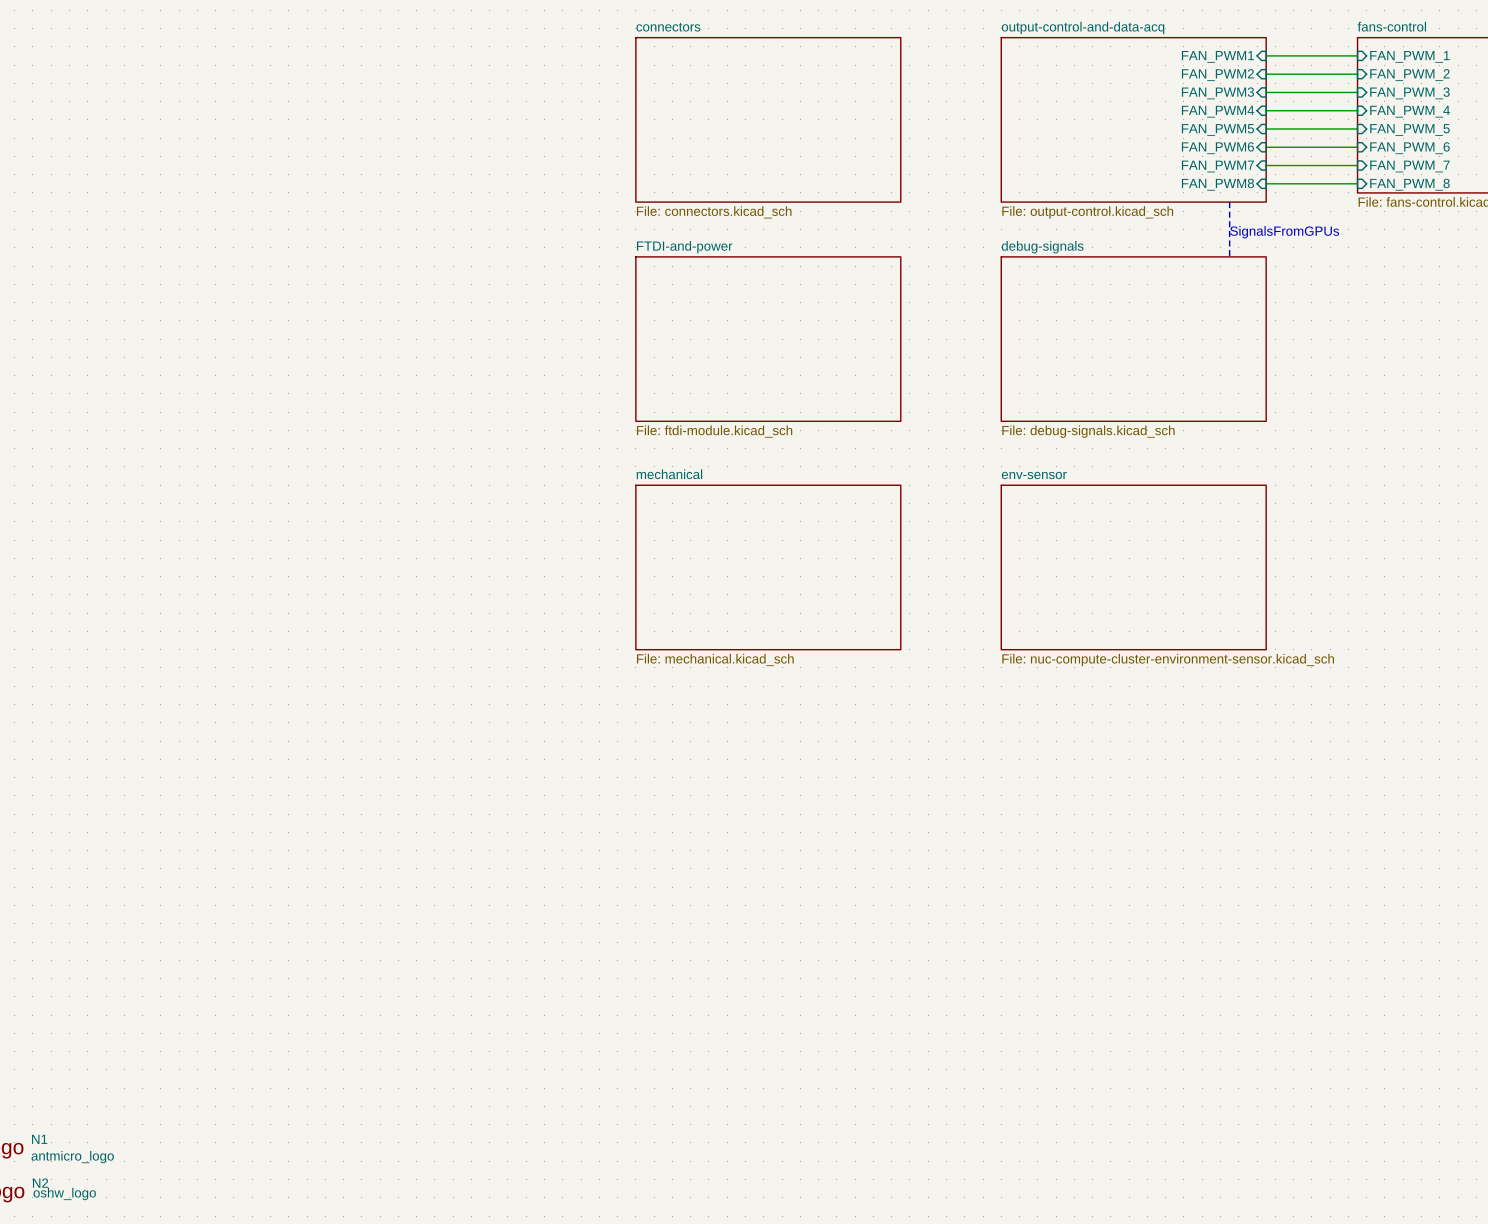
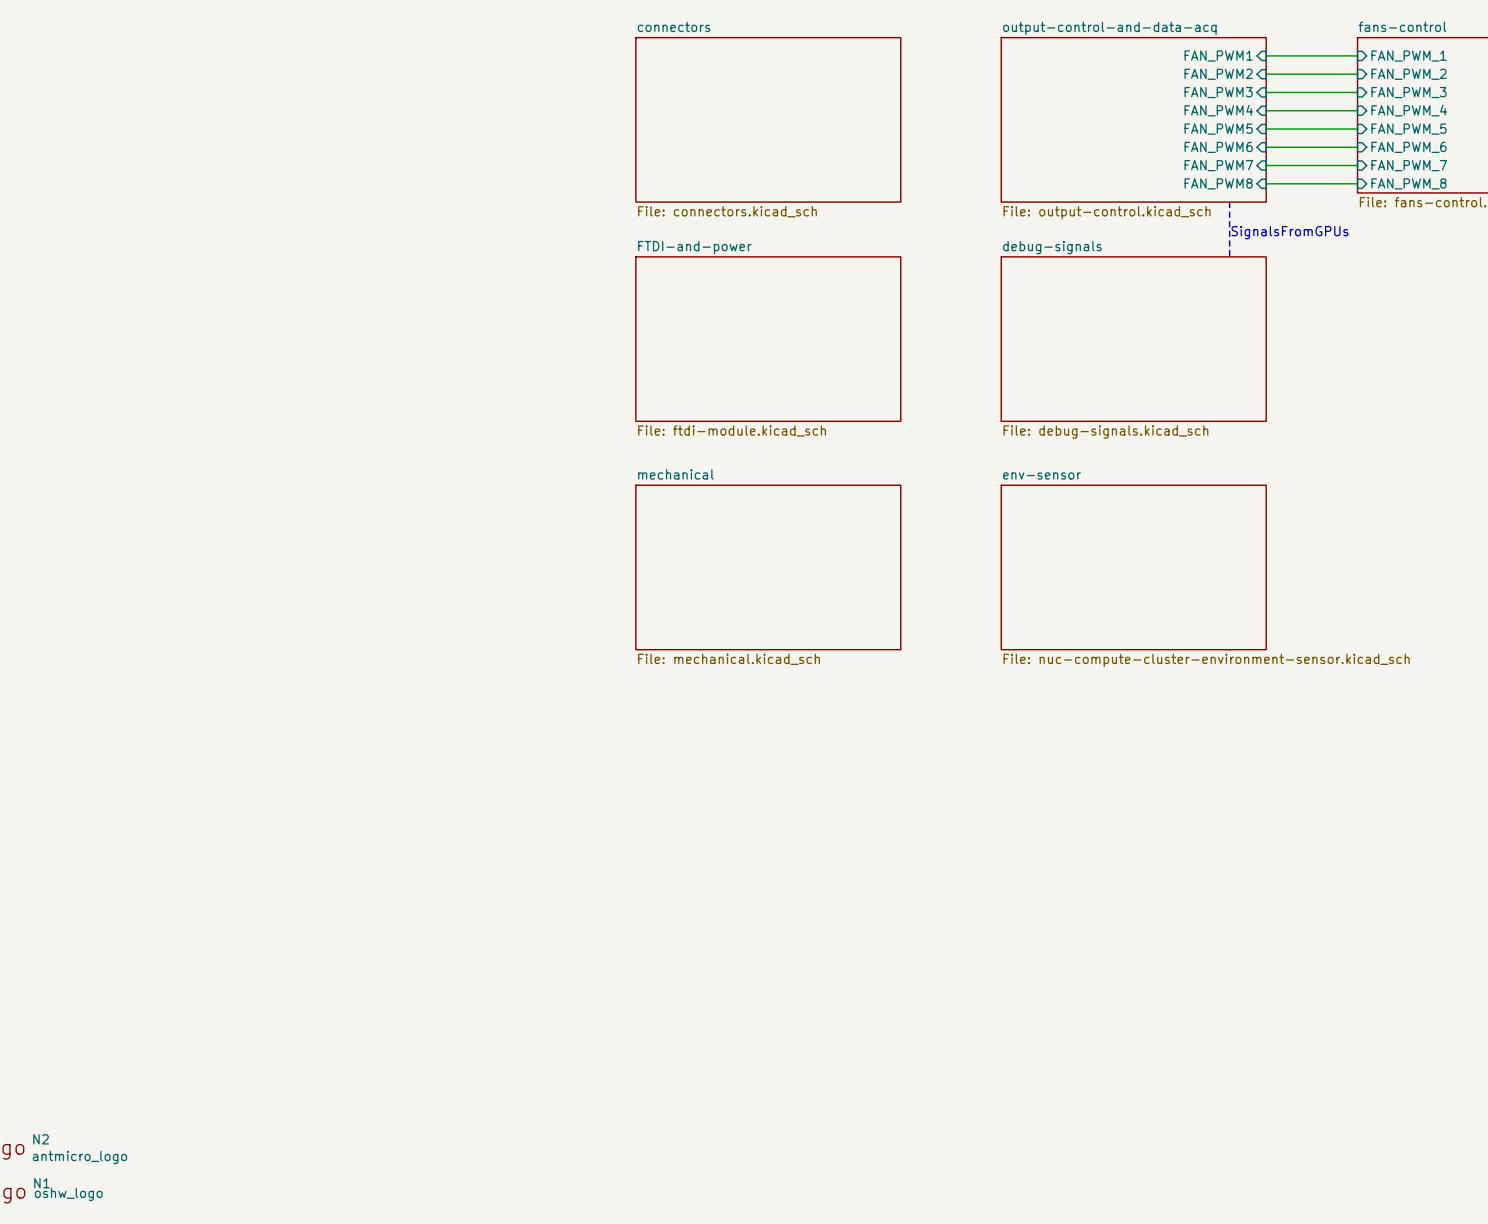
N1 name: N1 (39, 1139) -> N2 (41, 1139)
N2 name: N2 (40, 1183) -> N1 (41, 1183)

